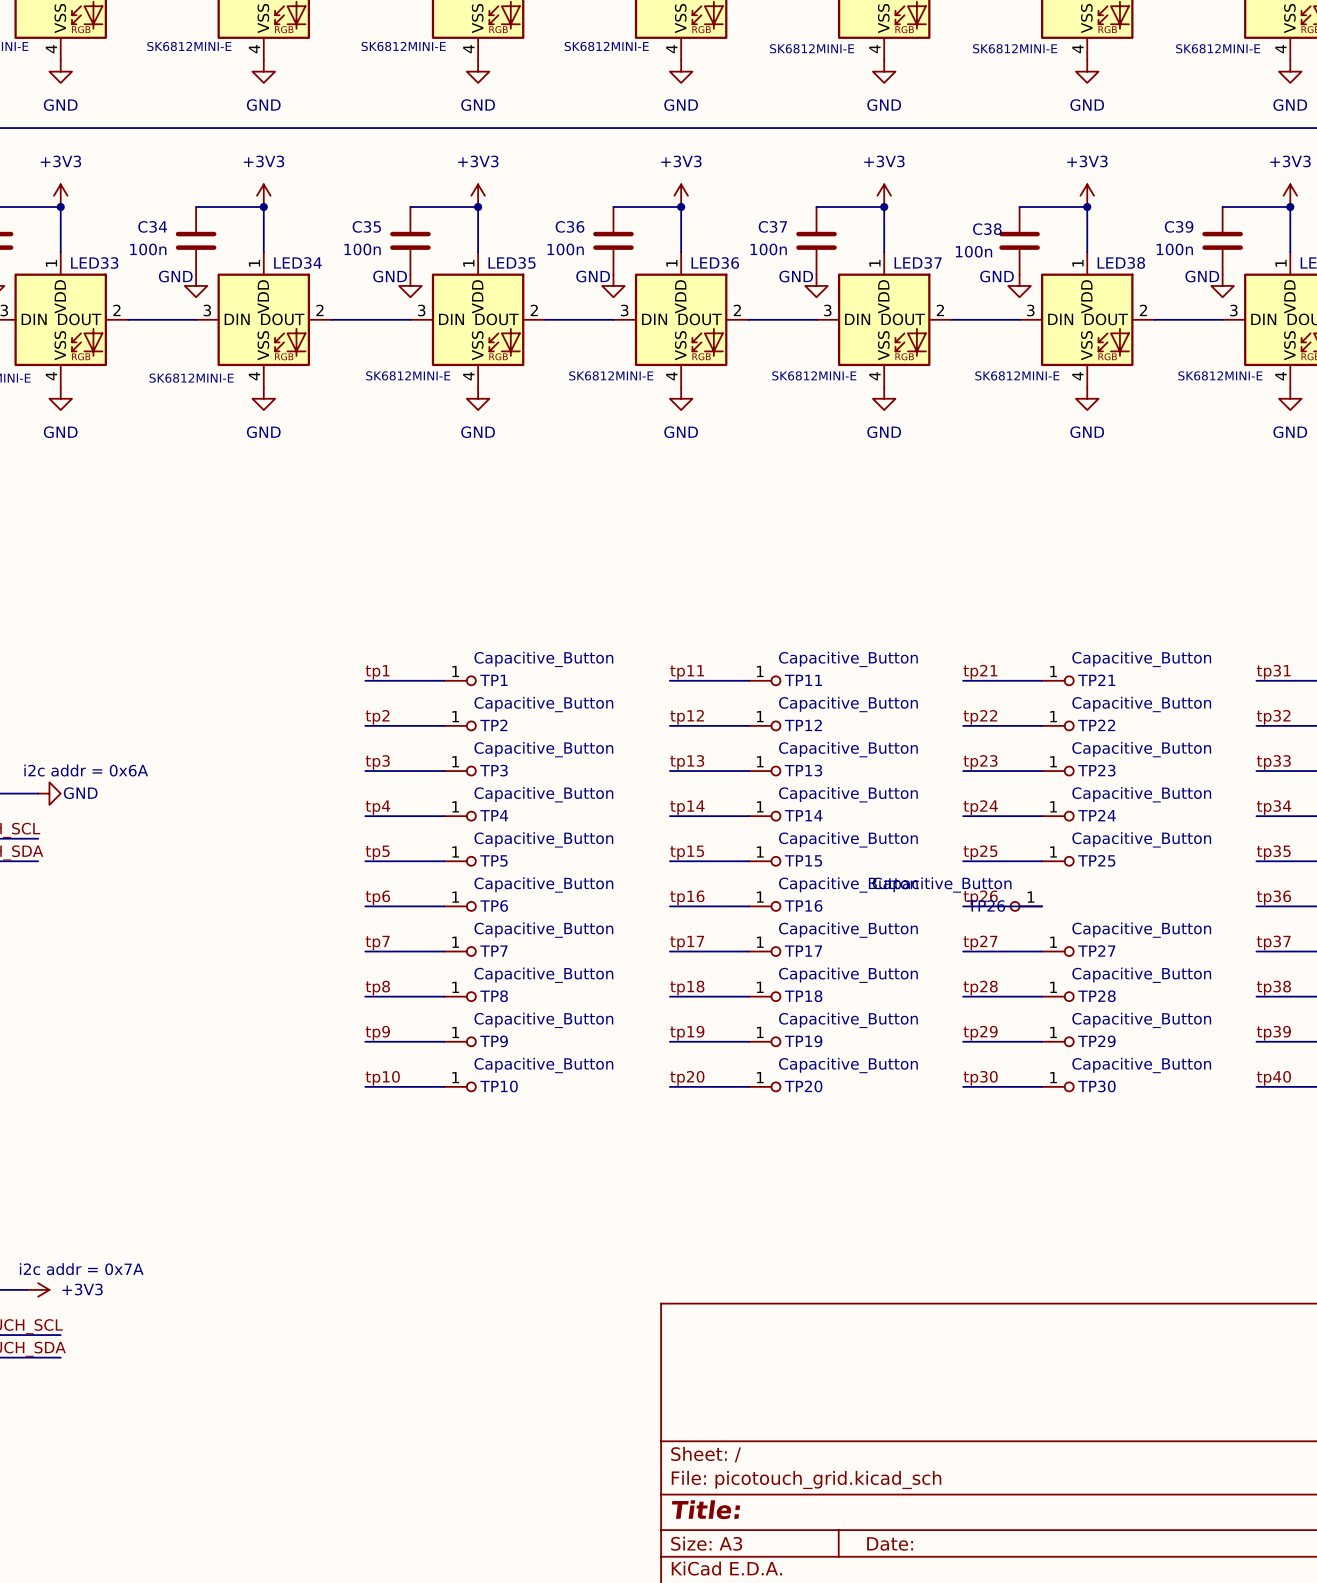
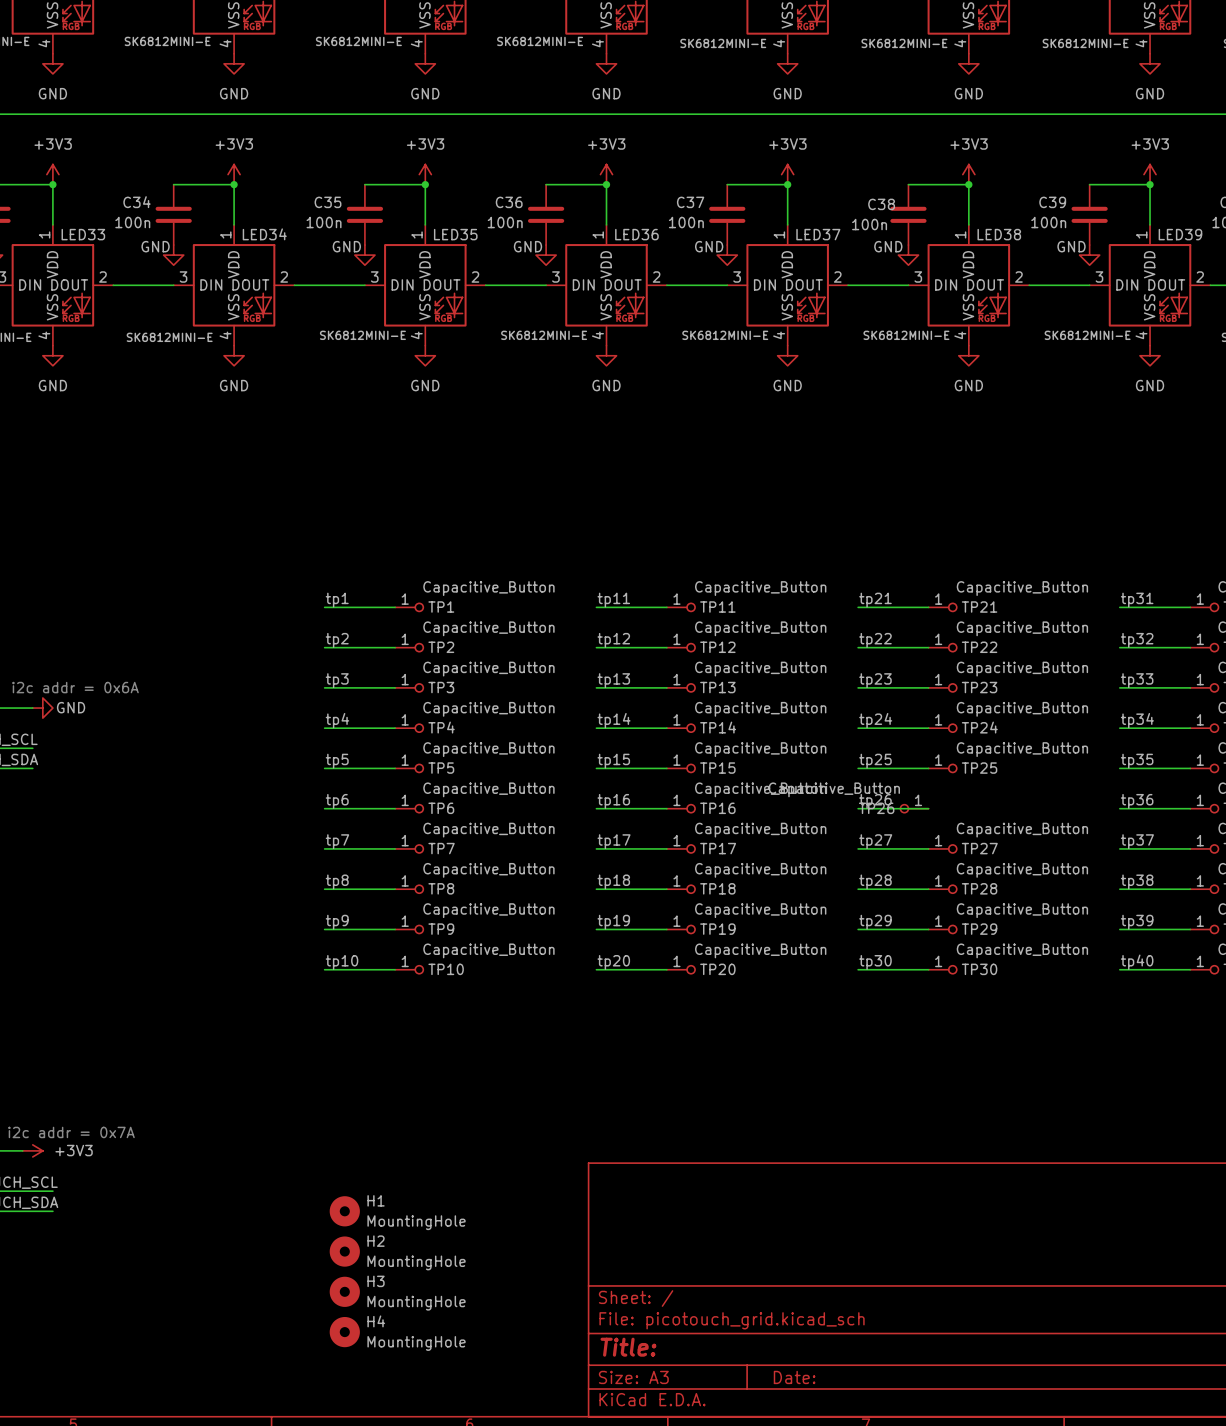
H1: none -> MountingHole (344, 1211)
H2: none -> MountingHole (344, 1251)
H3: none -> MountingHole (344, 1291)
H4: none -> MountingHole (344, 1332)

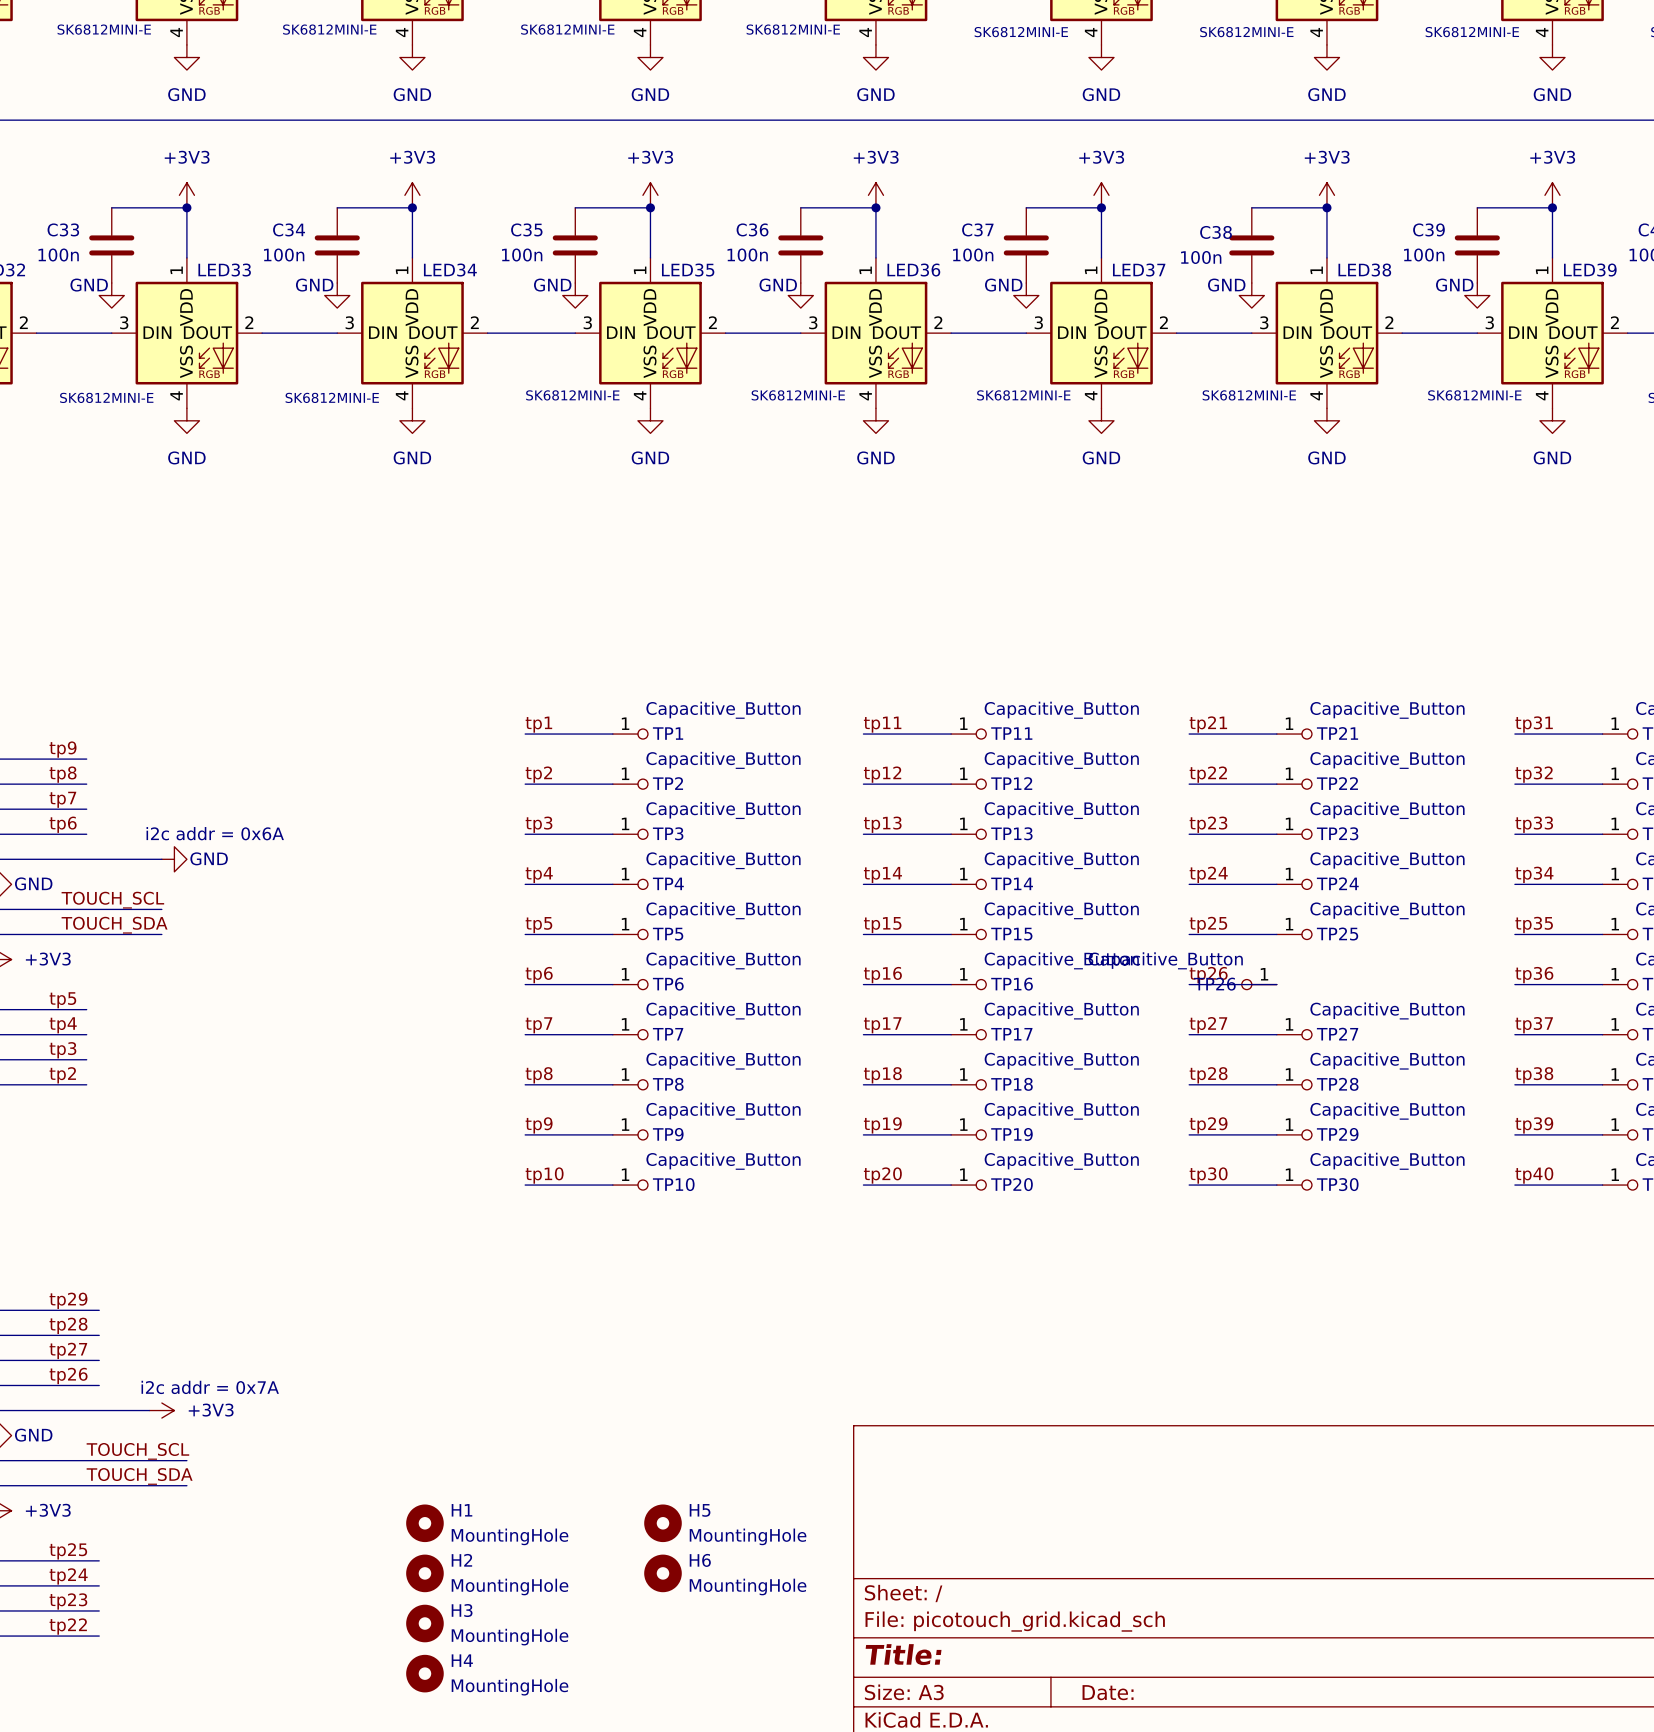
H1 position: (344, 1211) -> (424, 1523)
H5: none -> MountingHole (662, 1523)
H2 position: (344, 1251) -> (424, 1573)
H6: none -> MountingHole (662, 1573)
H3 position: (344, 1291) -> (424, 1623)
H4 position: (344, 1332) -> (424, 1673)

